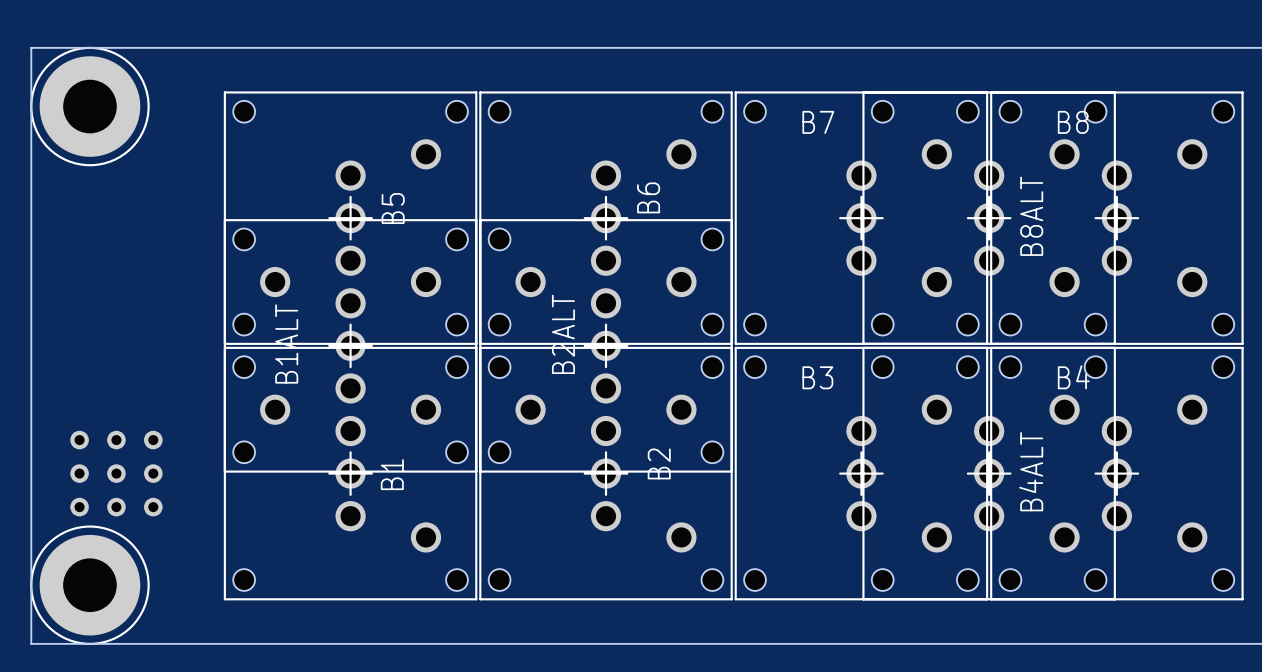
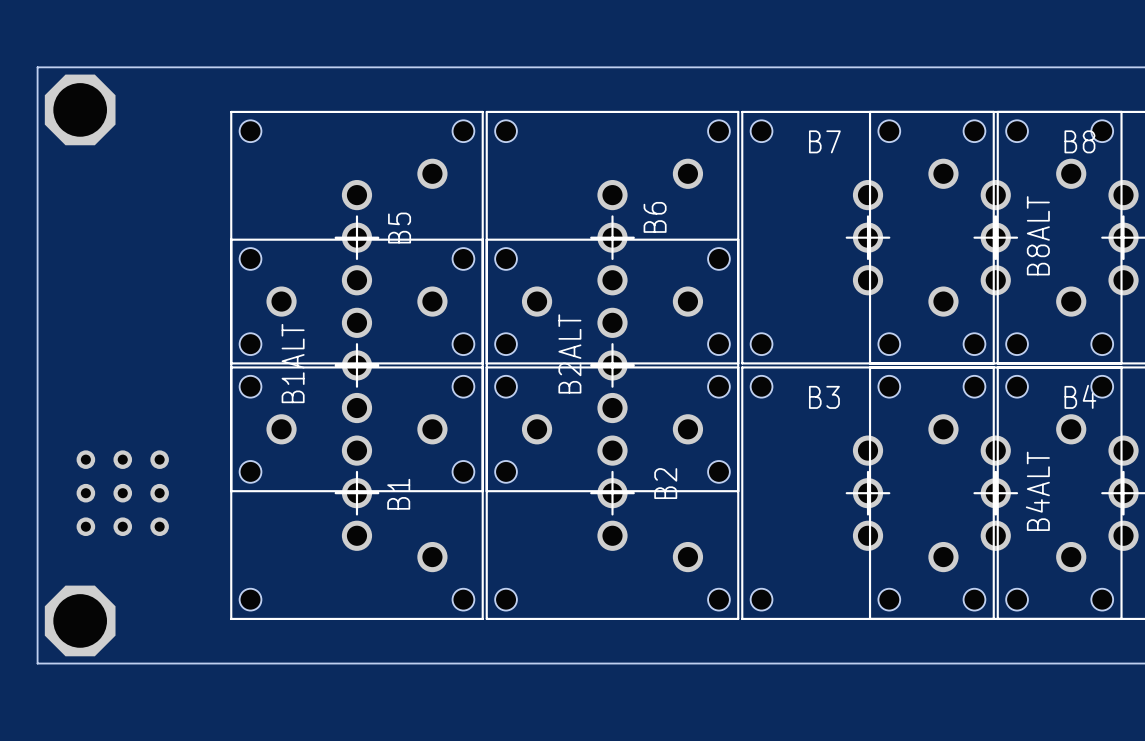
part: none -> (80, 109)
part: (89, 106) -> none
part: (89, 585) -> none
part: none -> (80, 620)

